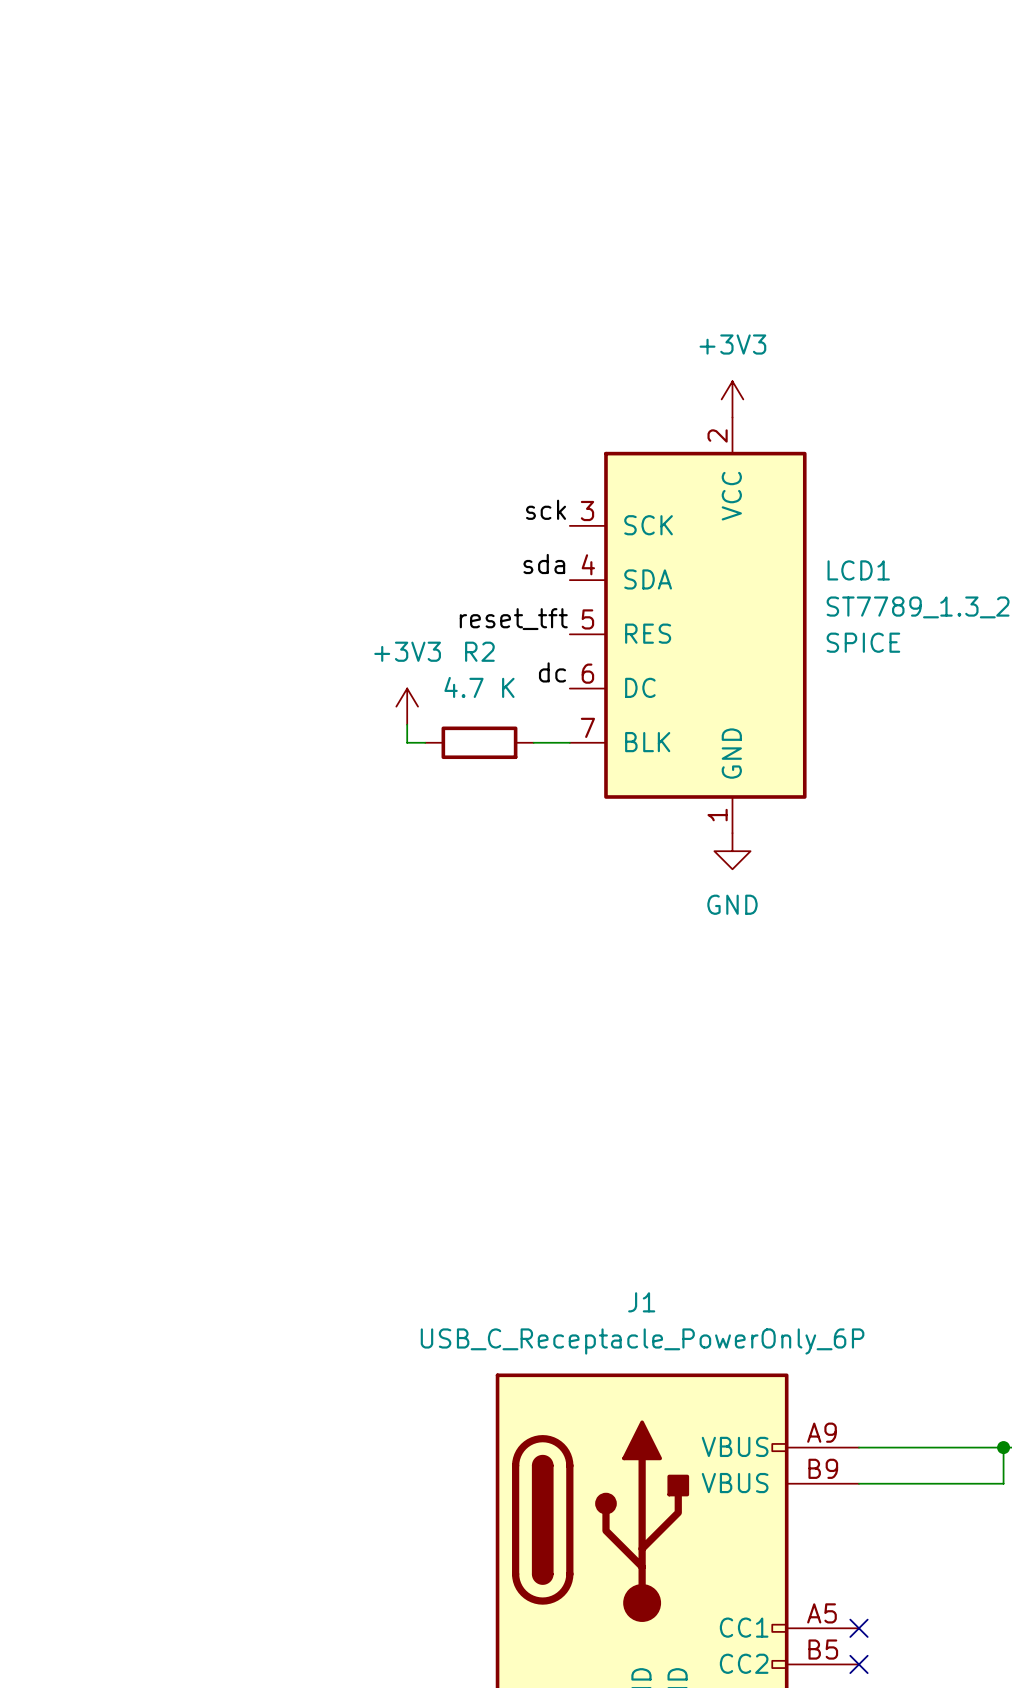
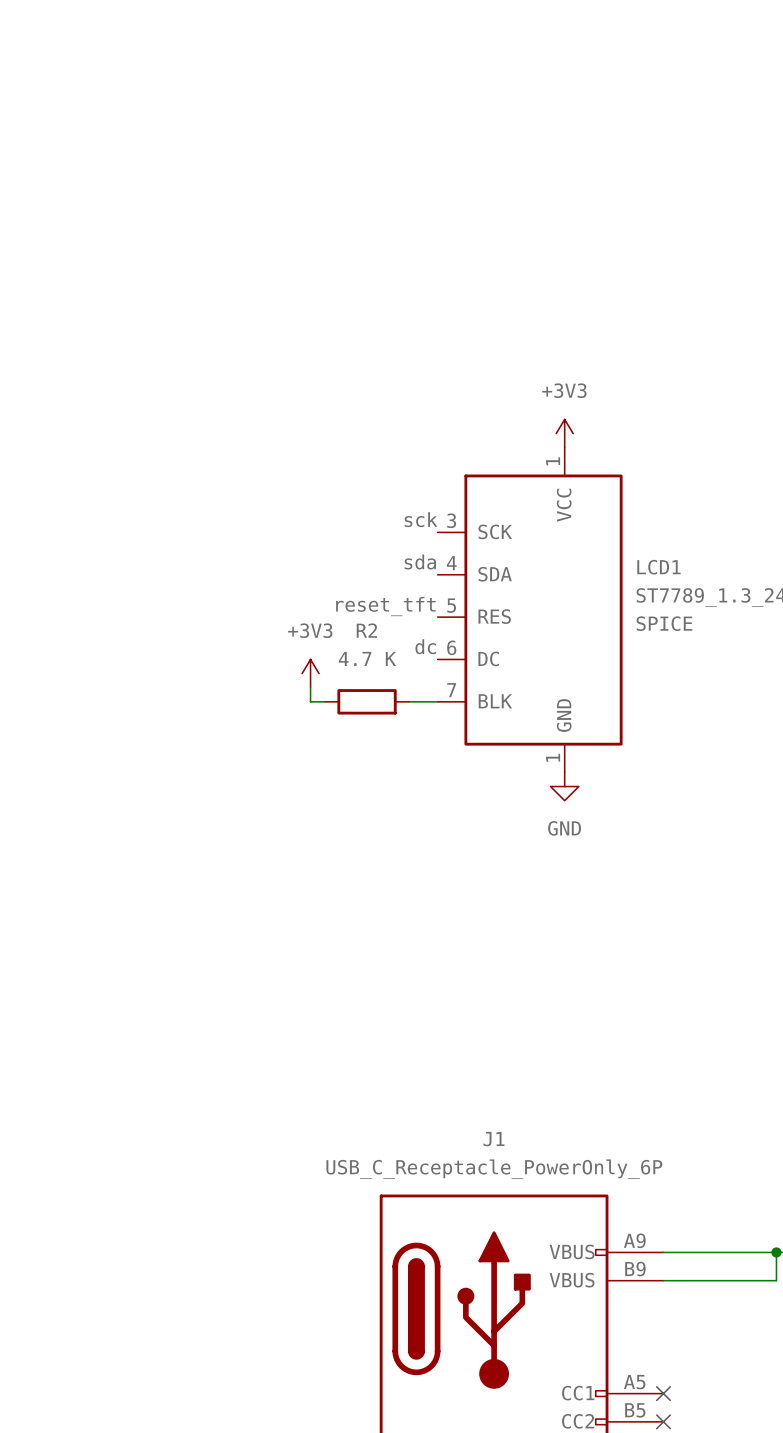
LCD1 pin number: 2 (717, 435) -> 1 (553, 461)

